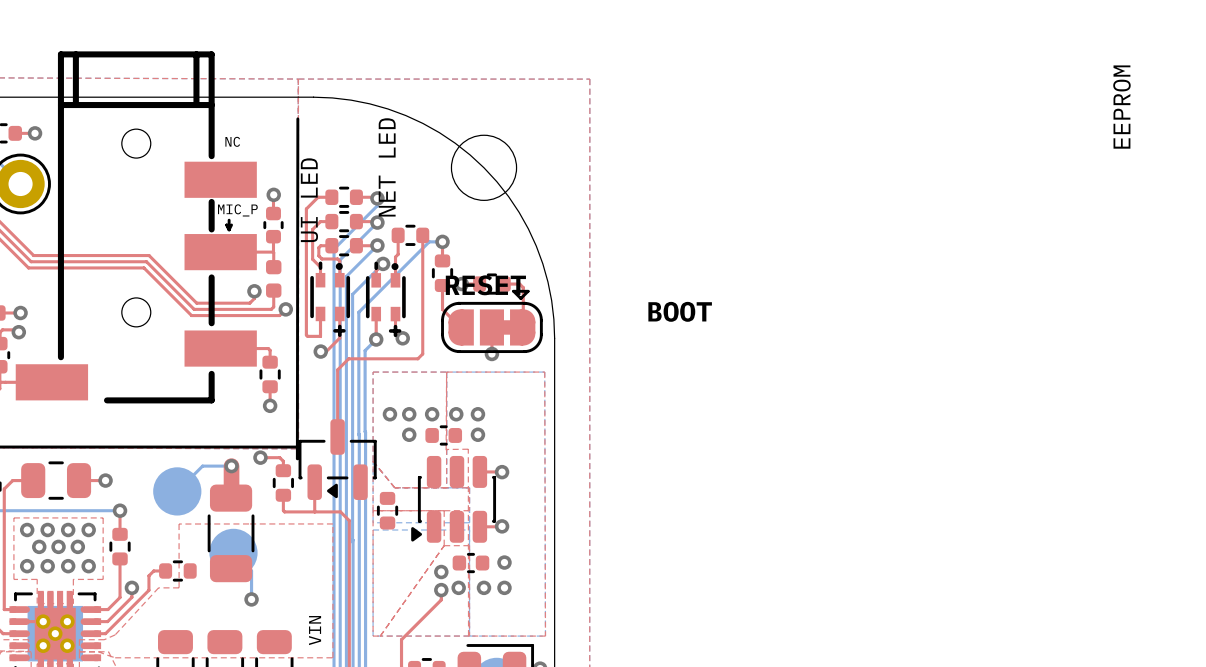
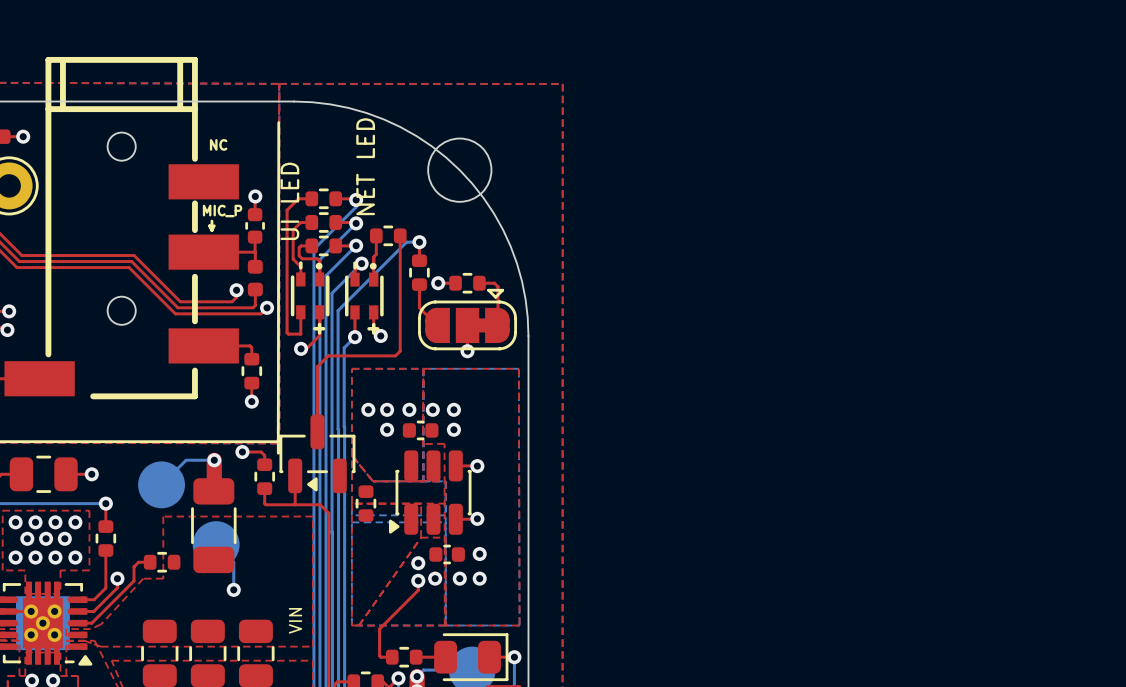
text: EEPROM (1121, 107) -> none
text: RESET (485, 285) -> none
text: BOOT (680, 311) -> none

